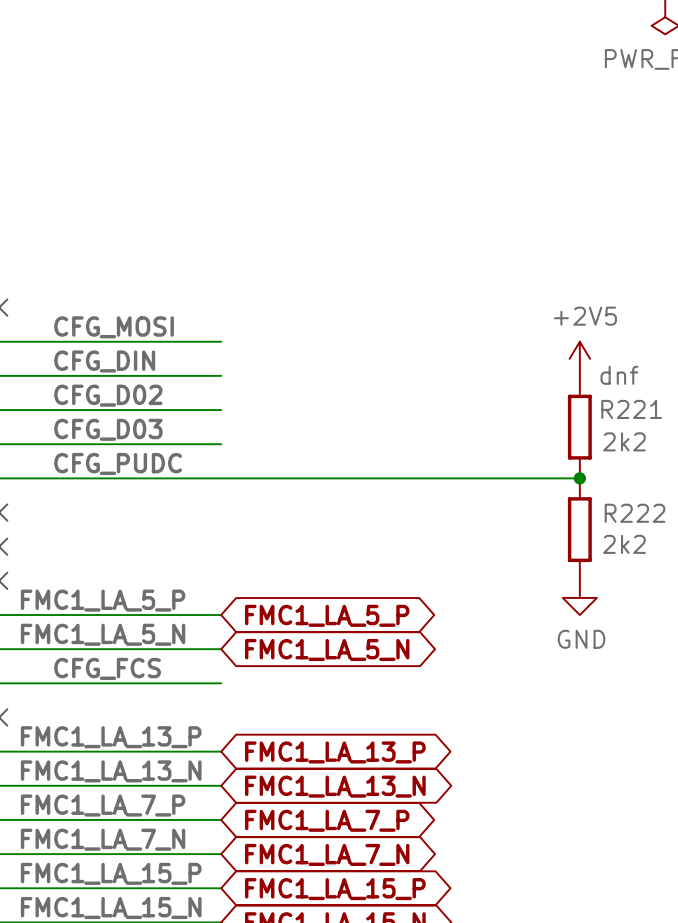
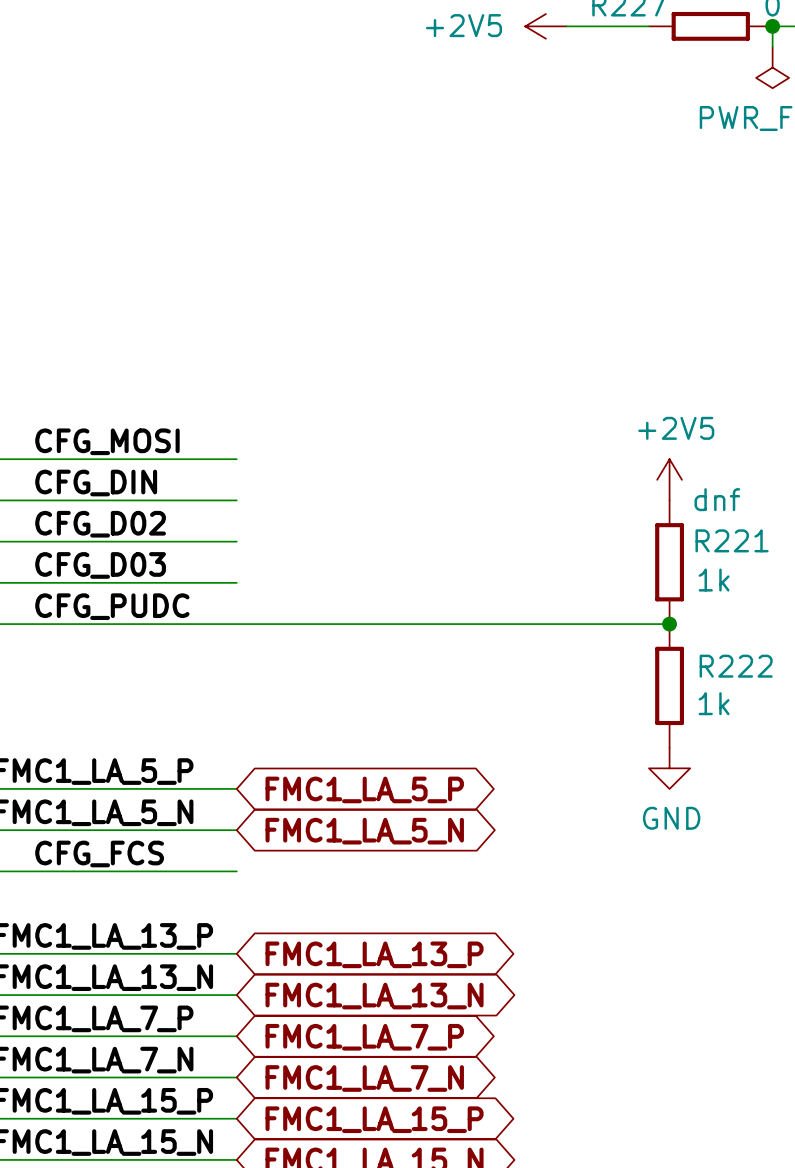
R221 text: 2k2 (624, 441) -> 1k (714, 580)
R222 text: 2k2 (624, 544) -> 1k (714, 703)

